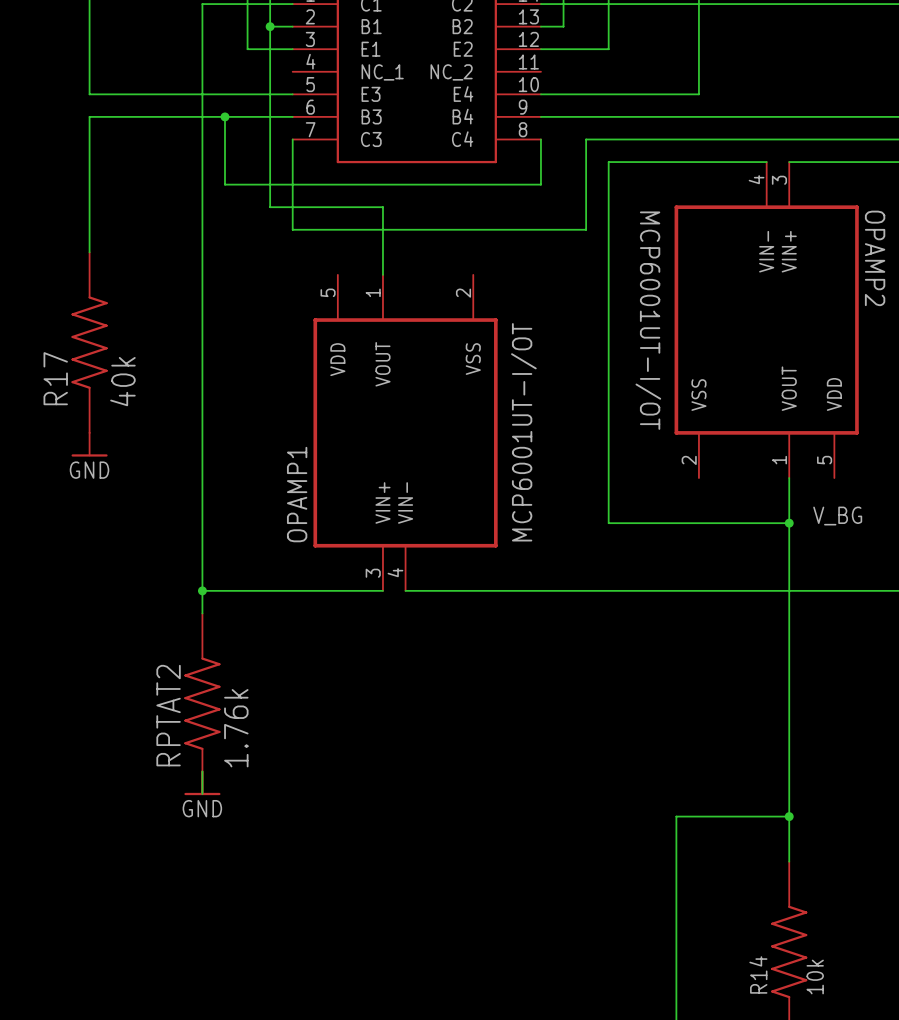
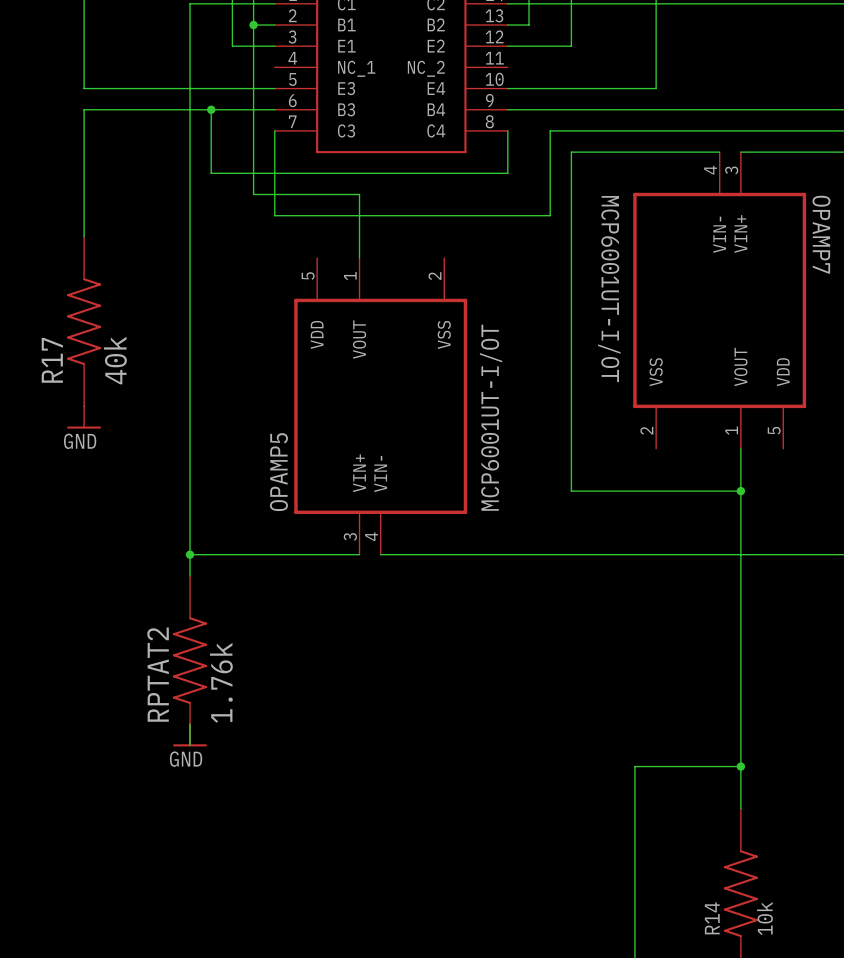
OPAMP2 name: OPAMP2 (875, 258) -> OPAMP7 (821, 234)
OPAMP1 name: OPAMP1 (297, 494) -> OPAMP5 (278, 472)
label: V_BG (837, 516) -> none

